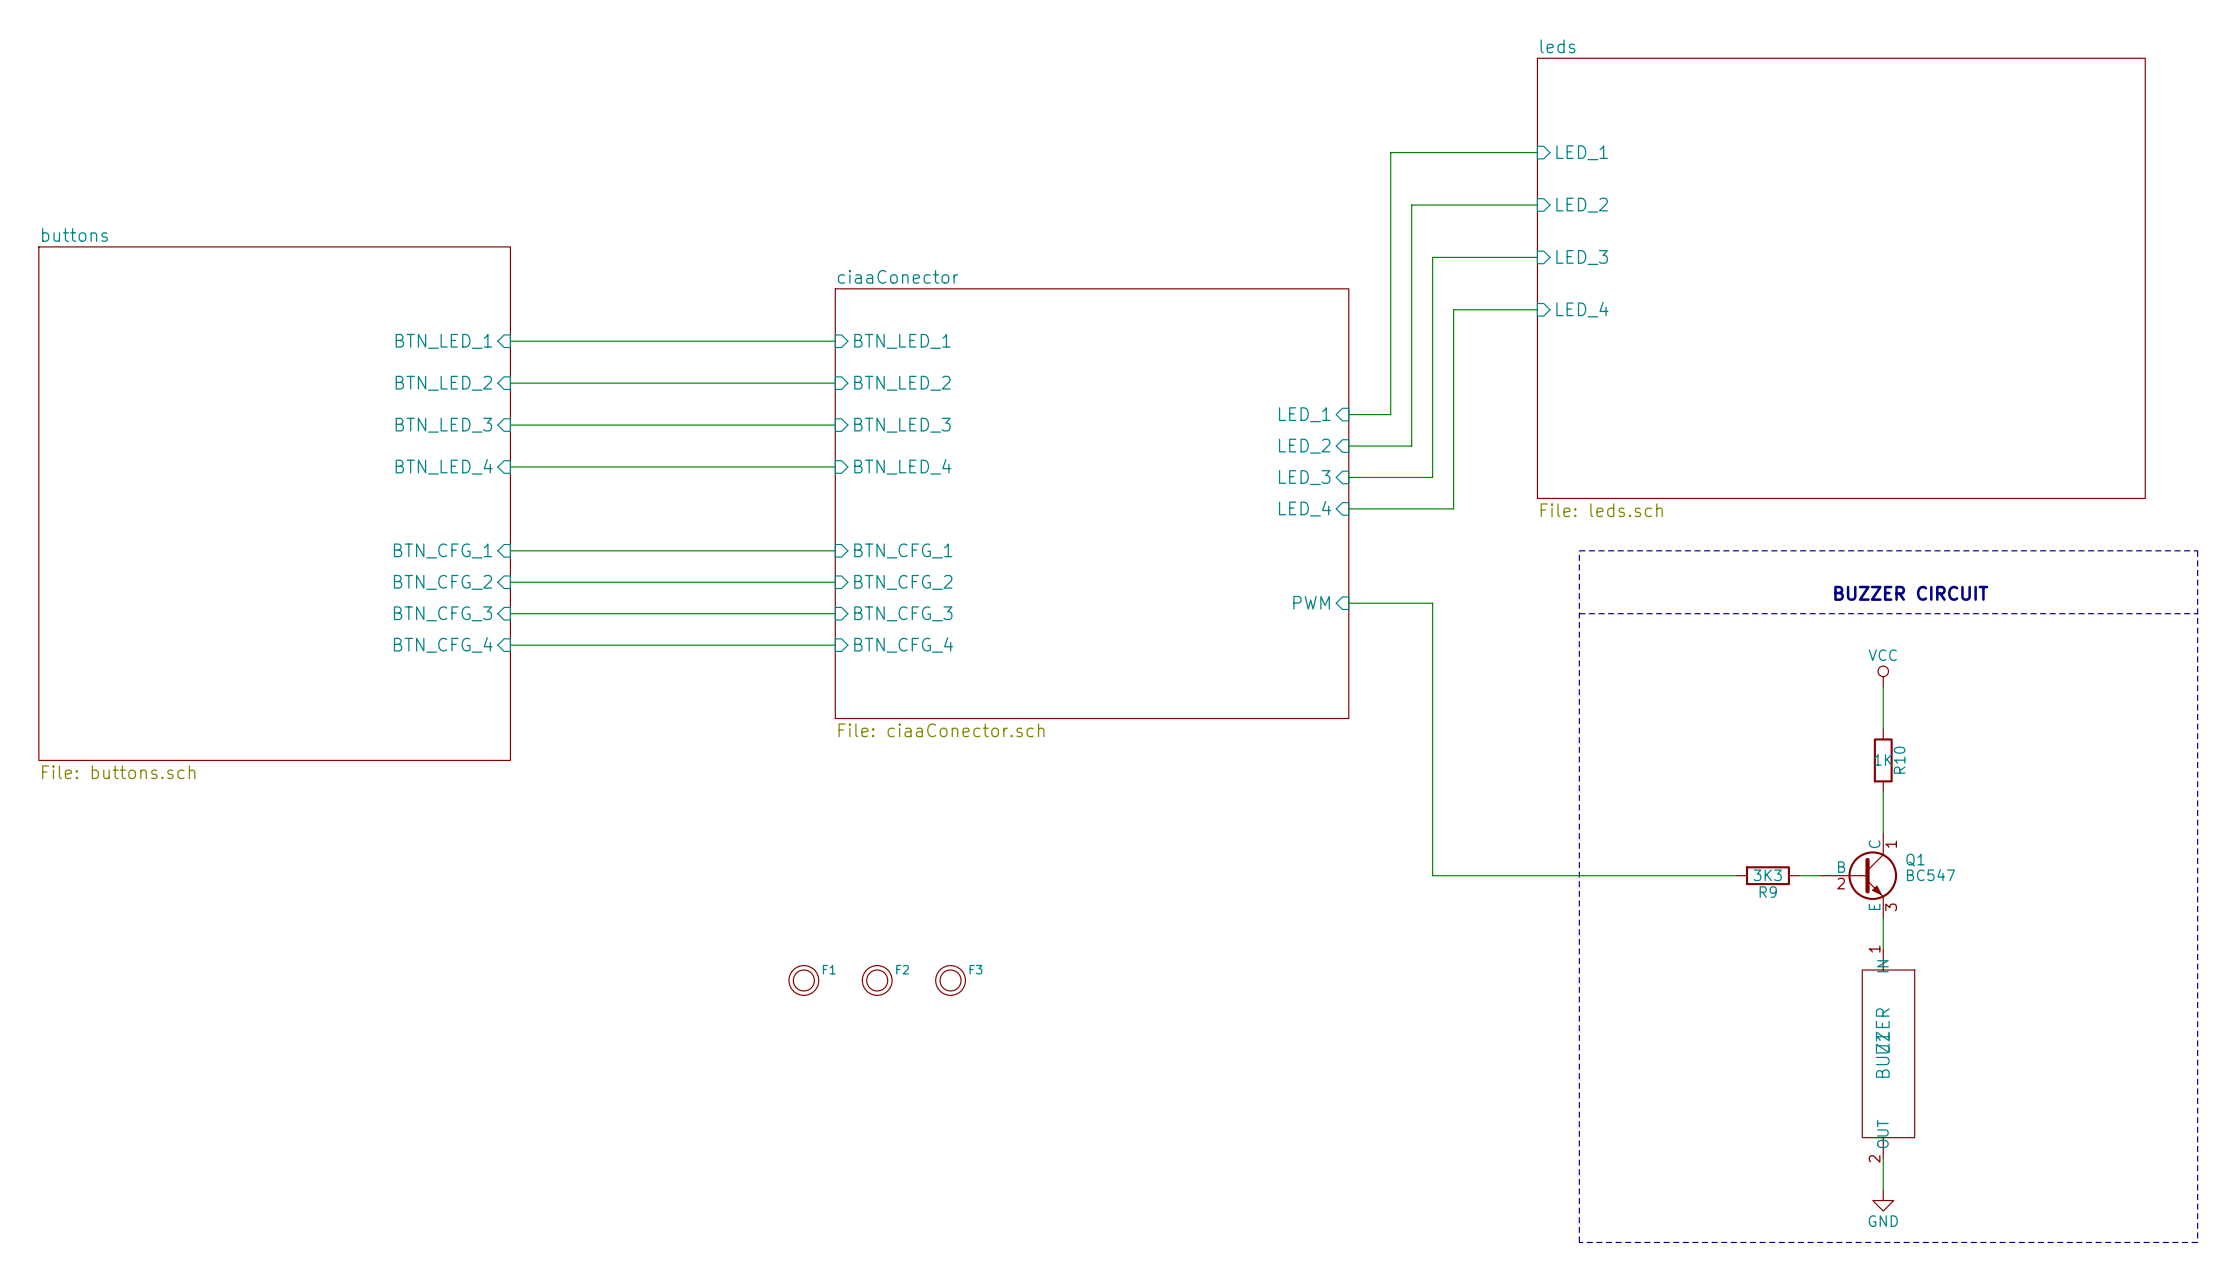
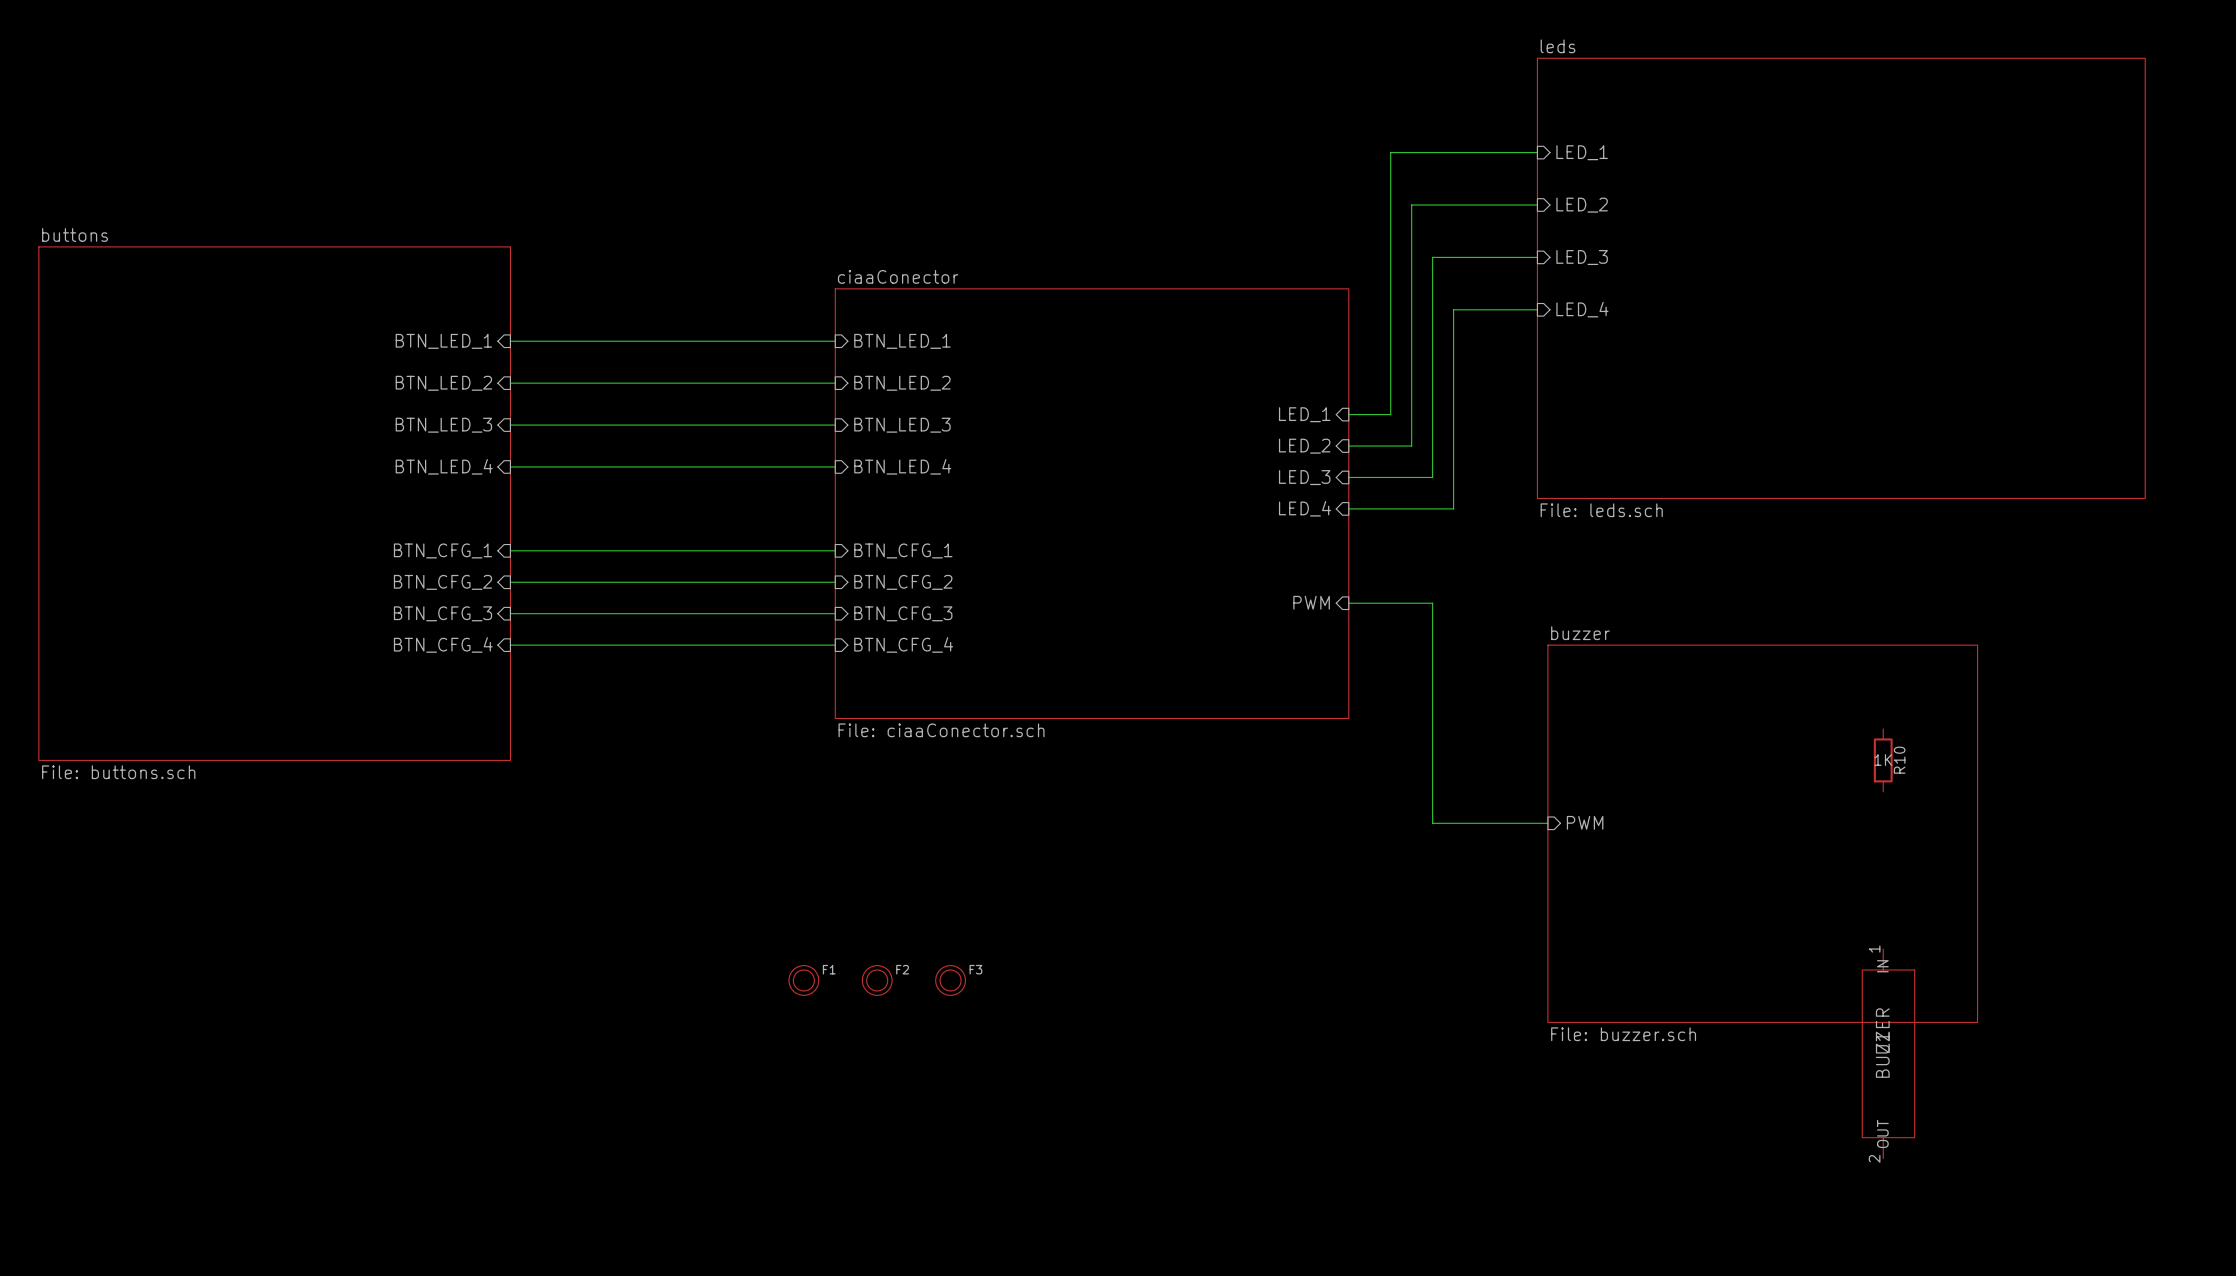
line: (1579, 550) (2197, 550) (2197, 1242) (1579, 1242) (1579, 550) -> none
text: BUZZER CIRCUIT (1911, 593) -> none
line: (1579, 613) (2197, 613) -> none
power symbol: VCC (1883, 676) -> none
wire: (1883, 687) (1883, 728) -> none
wire: (1883, 791) (1883, 833) -> none
sheet pin: none -> PWM (1585, 822)
wire: (1432, 823) (1432, 875) (1736, 875) -> (1432, 823) (1547, 823)
sheet buzzer: none -> File: buzzer.sch (1762, 833)
R9: 3K3 (1767, 875) -> none
wire: (1799, 875) (1820, 875) -> none
Q1: BC547 (1858, 875) -> none
wire: (1883, 917) (1883, 949) -> none
wire: (1883, 1158) (1883, 1190) -> none
power symbol: GND (1883, 1200) -> none

